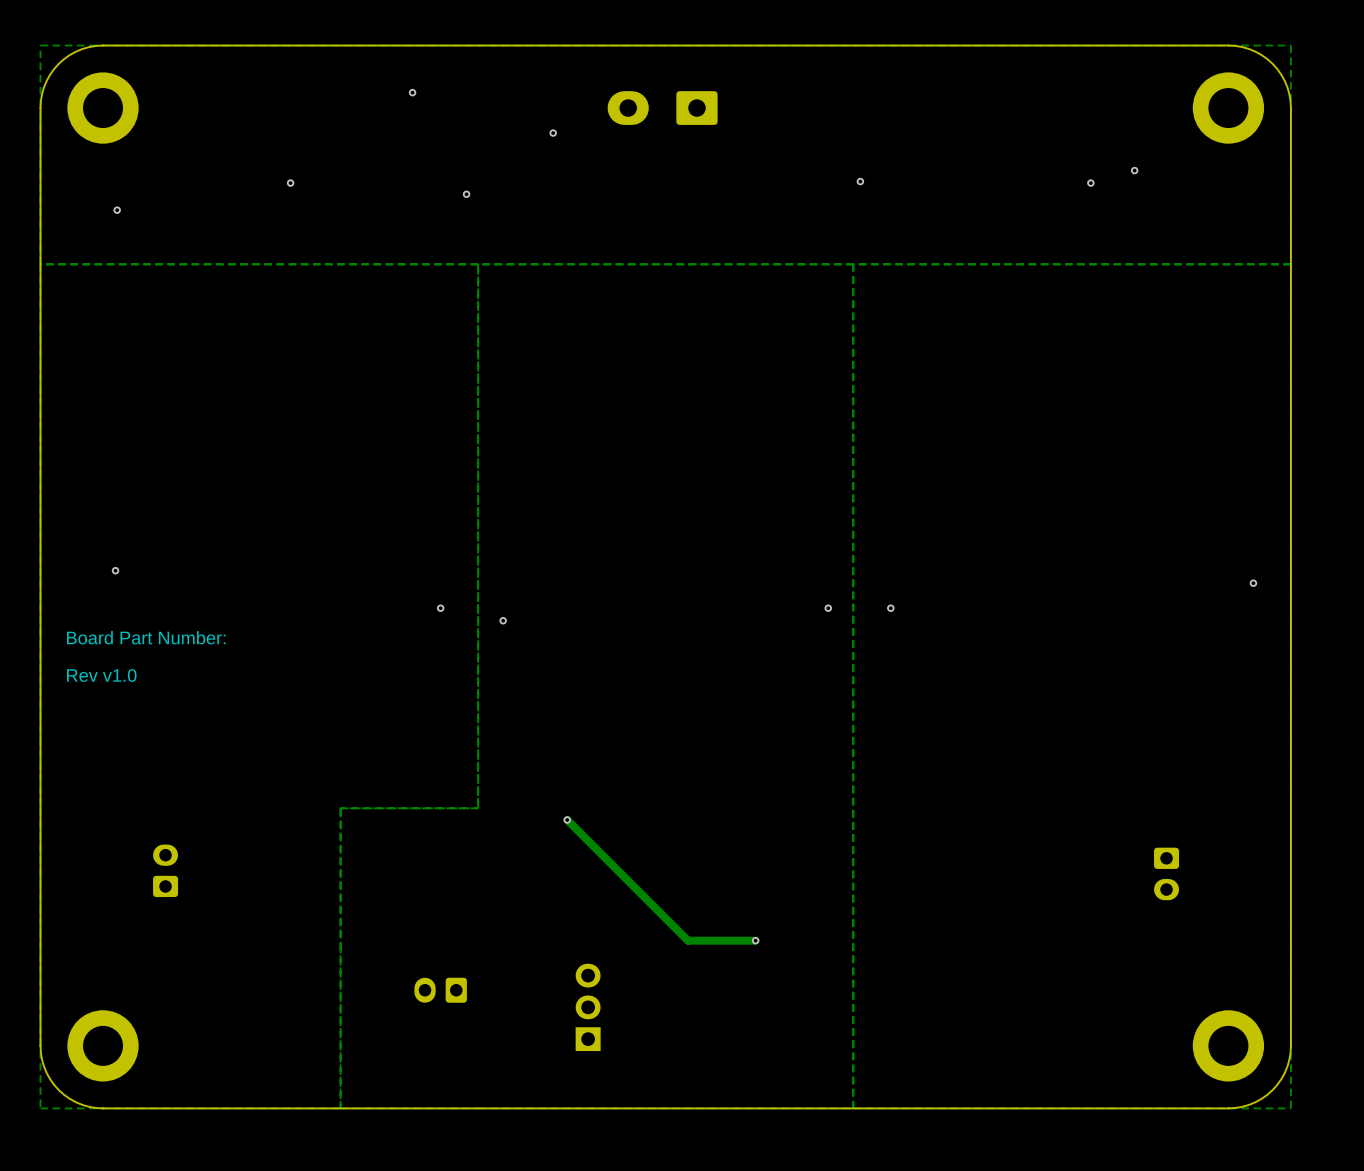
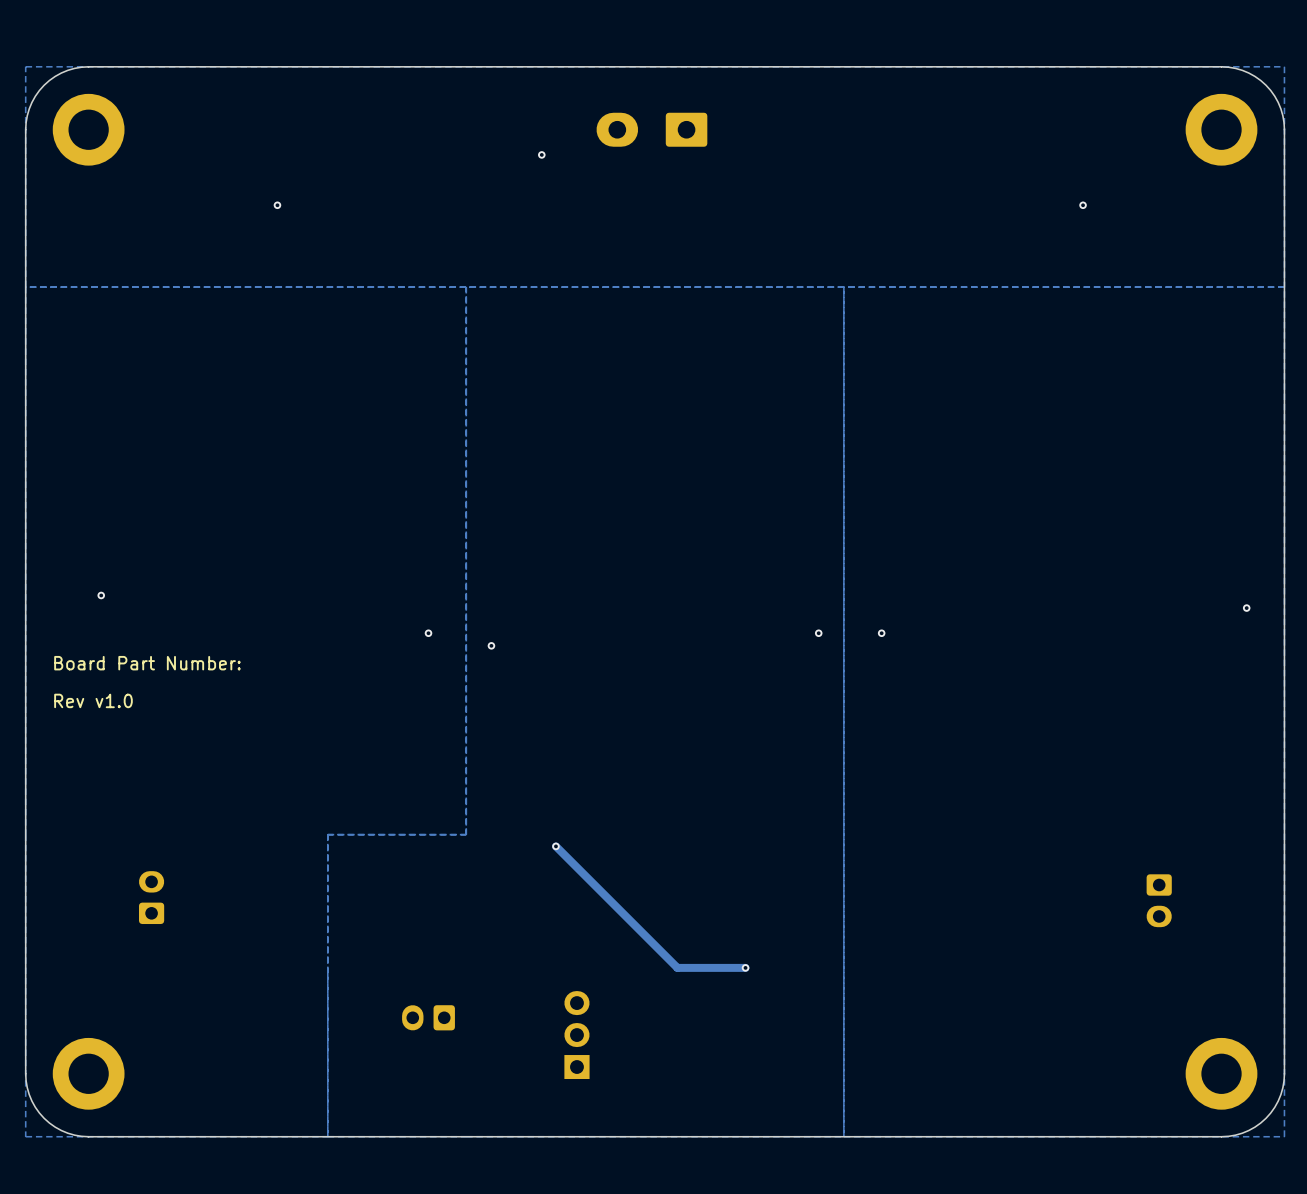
via: (412, 92) -> none
via: (1134, 170) -> none
via: (860, 181) -> none
via: (466, 194) -> none
via: (117, 210) -> none

